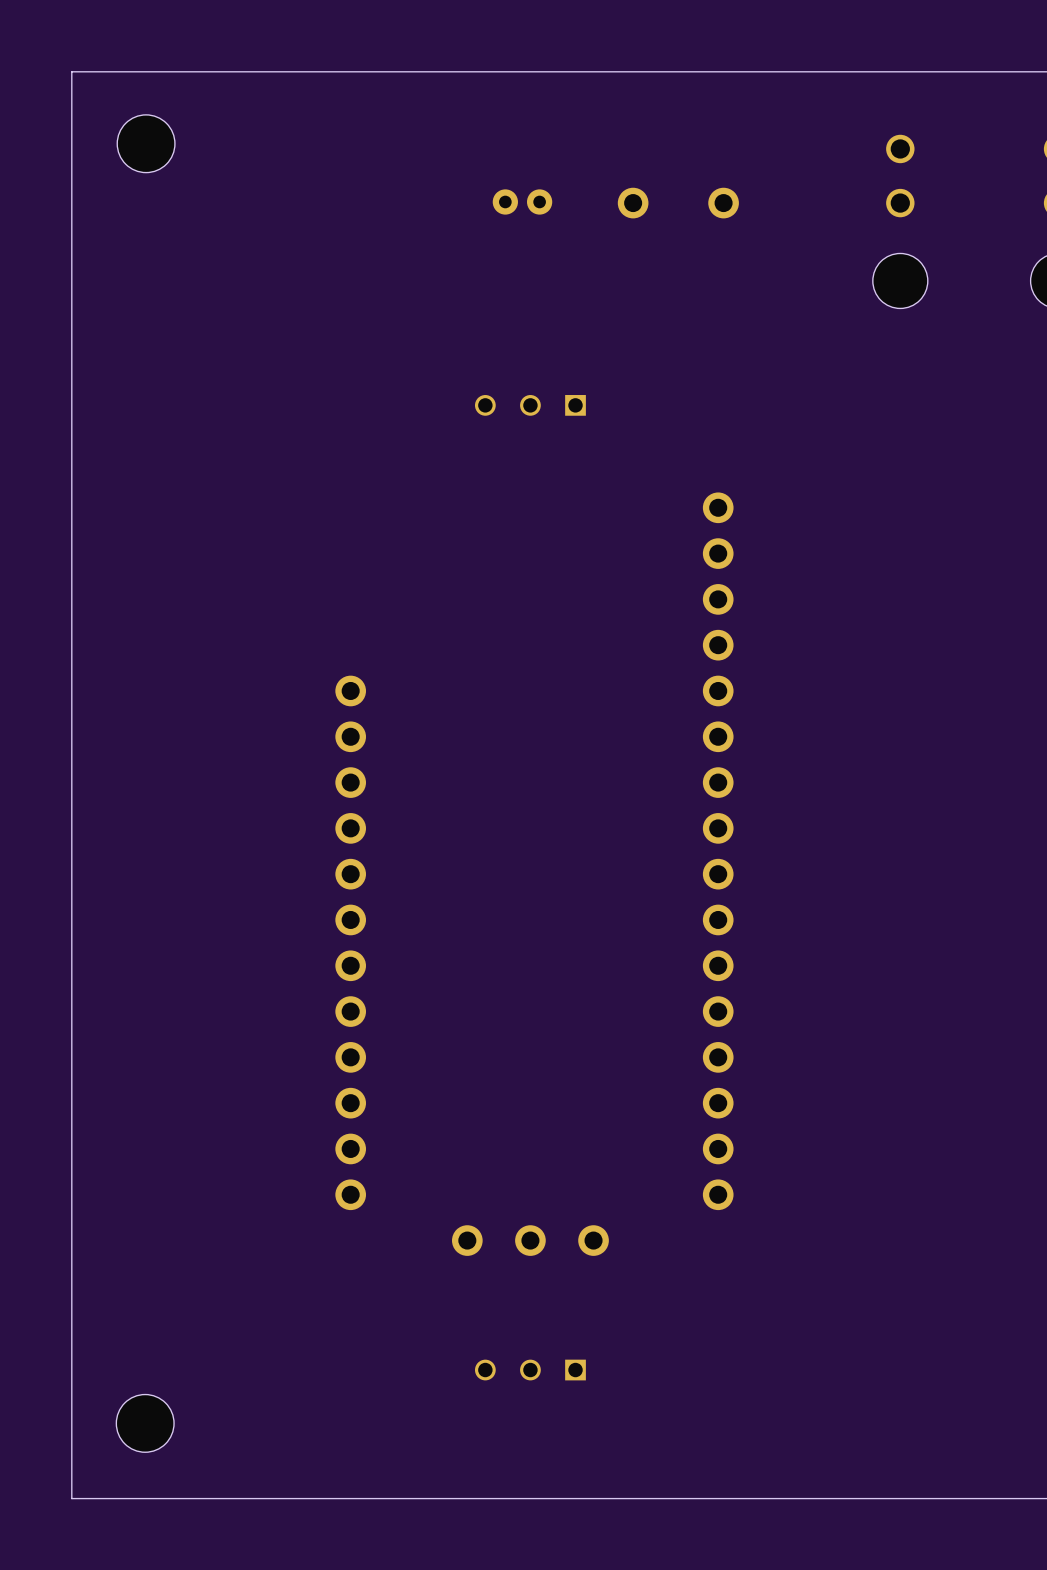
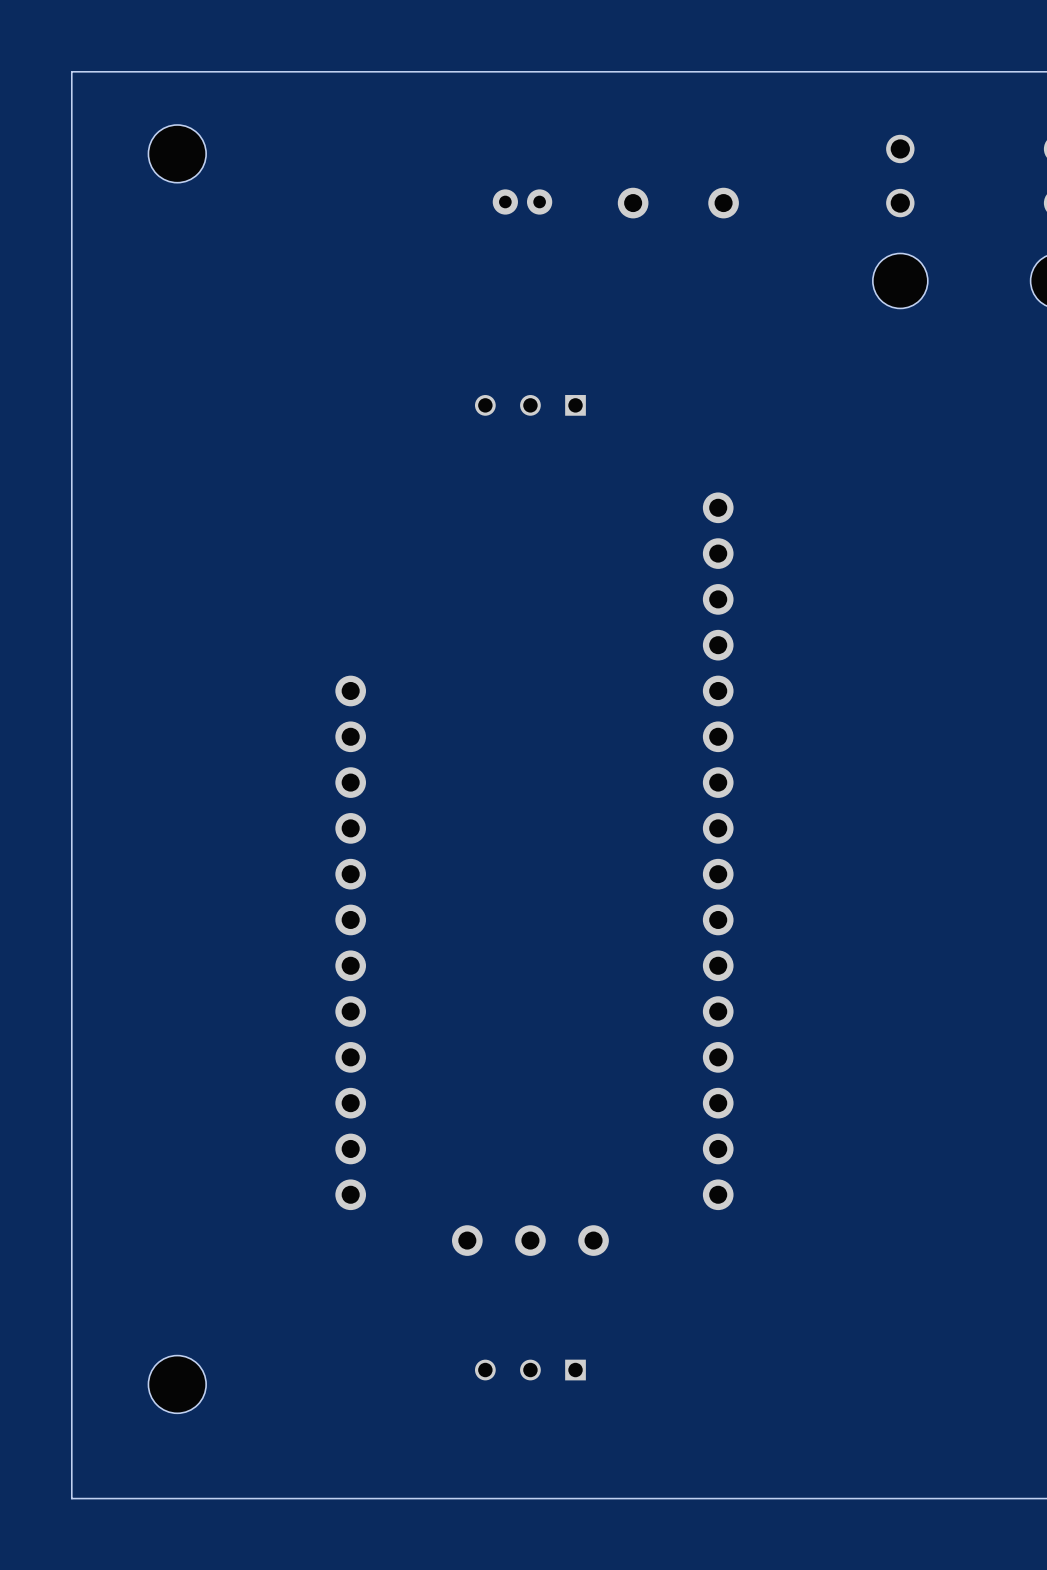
part position: (146, 143) -> (177, 153)
part position: (145, 1423) -> (177, 1384)

